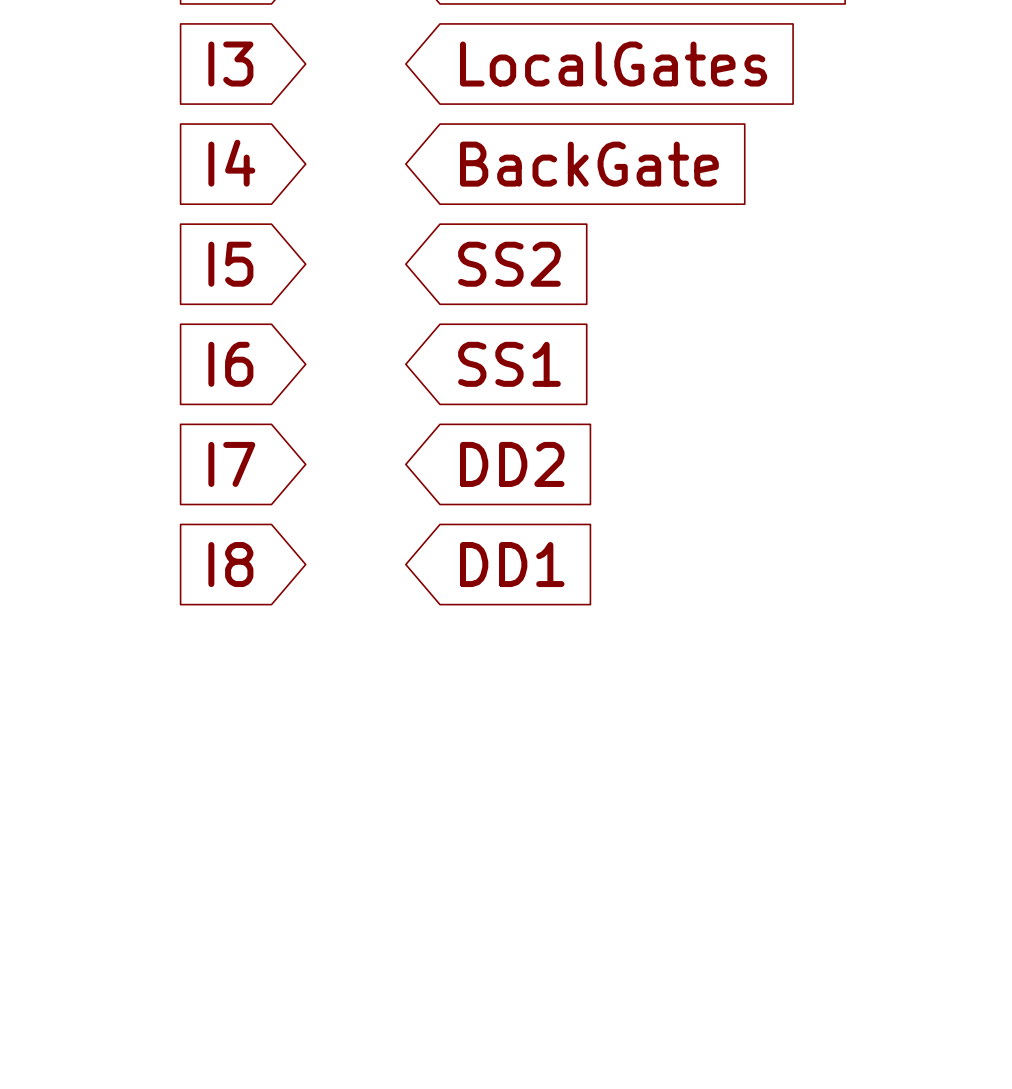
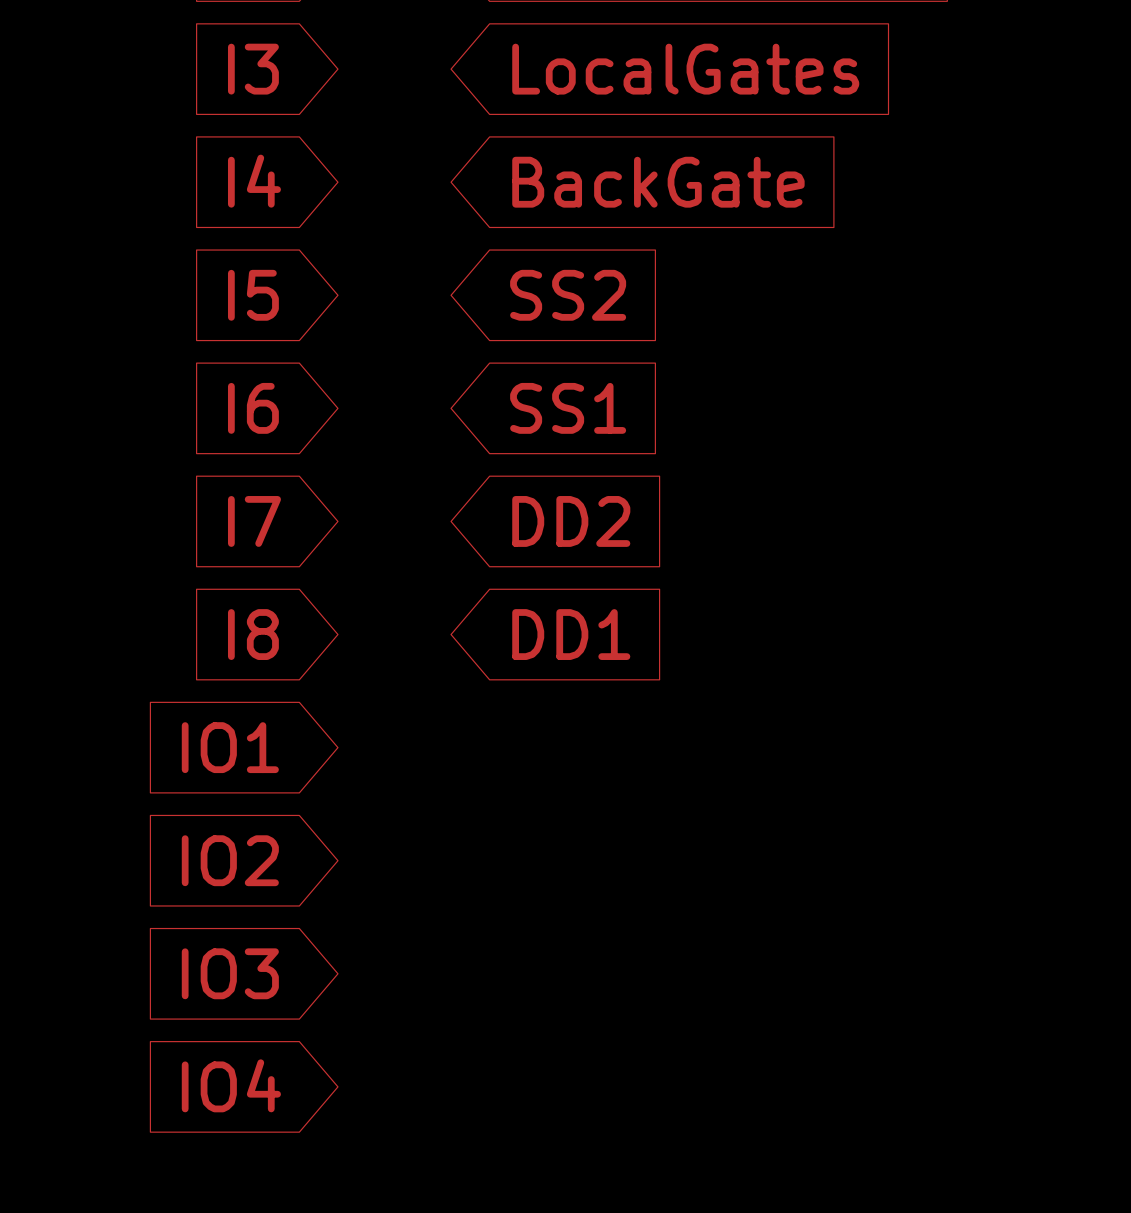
global label: none -> IO1 (230, 747)
global label: none -> IO2 (230, 860)
global label: none -> IO3 (230, 973)
global label: none -> IO4 (231, 1085)

